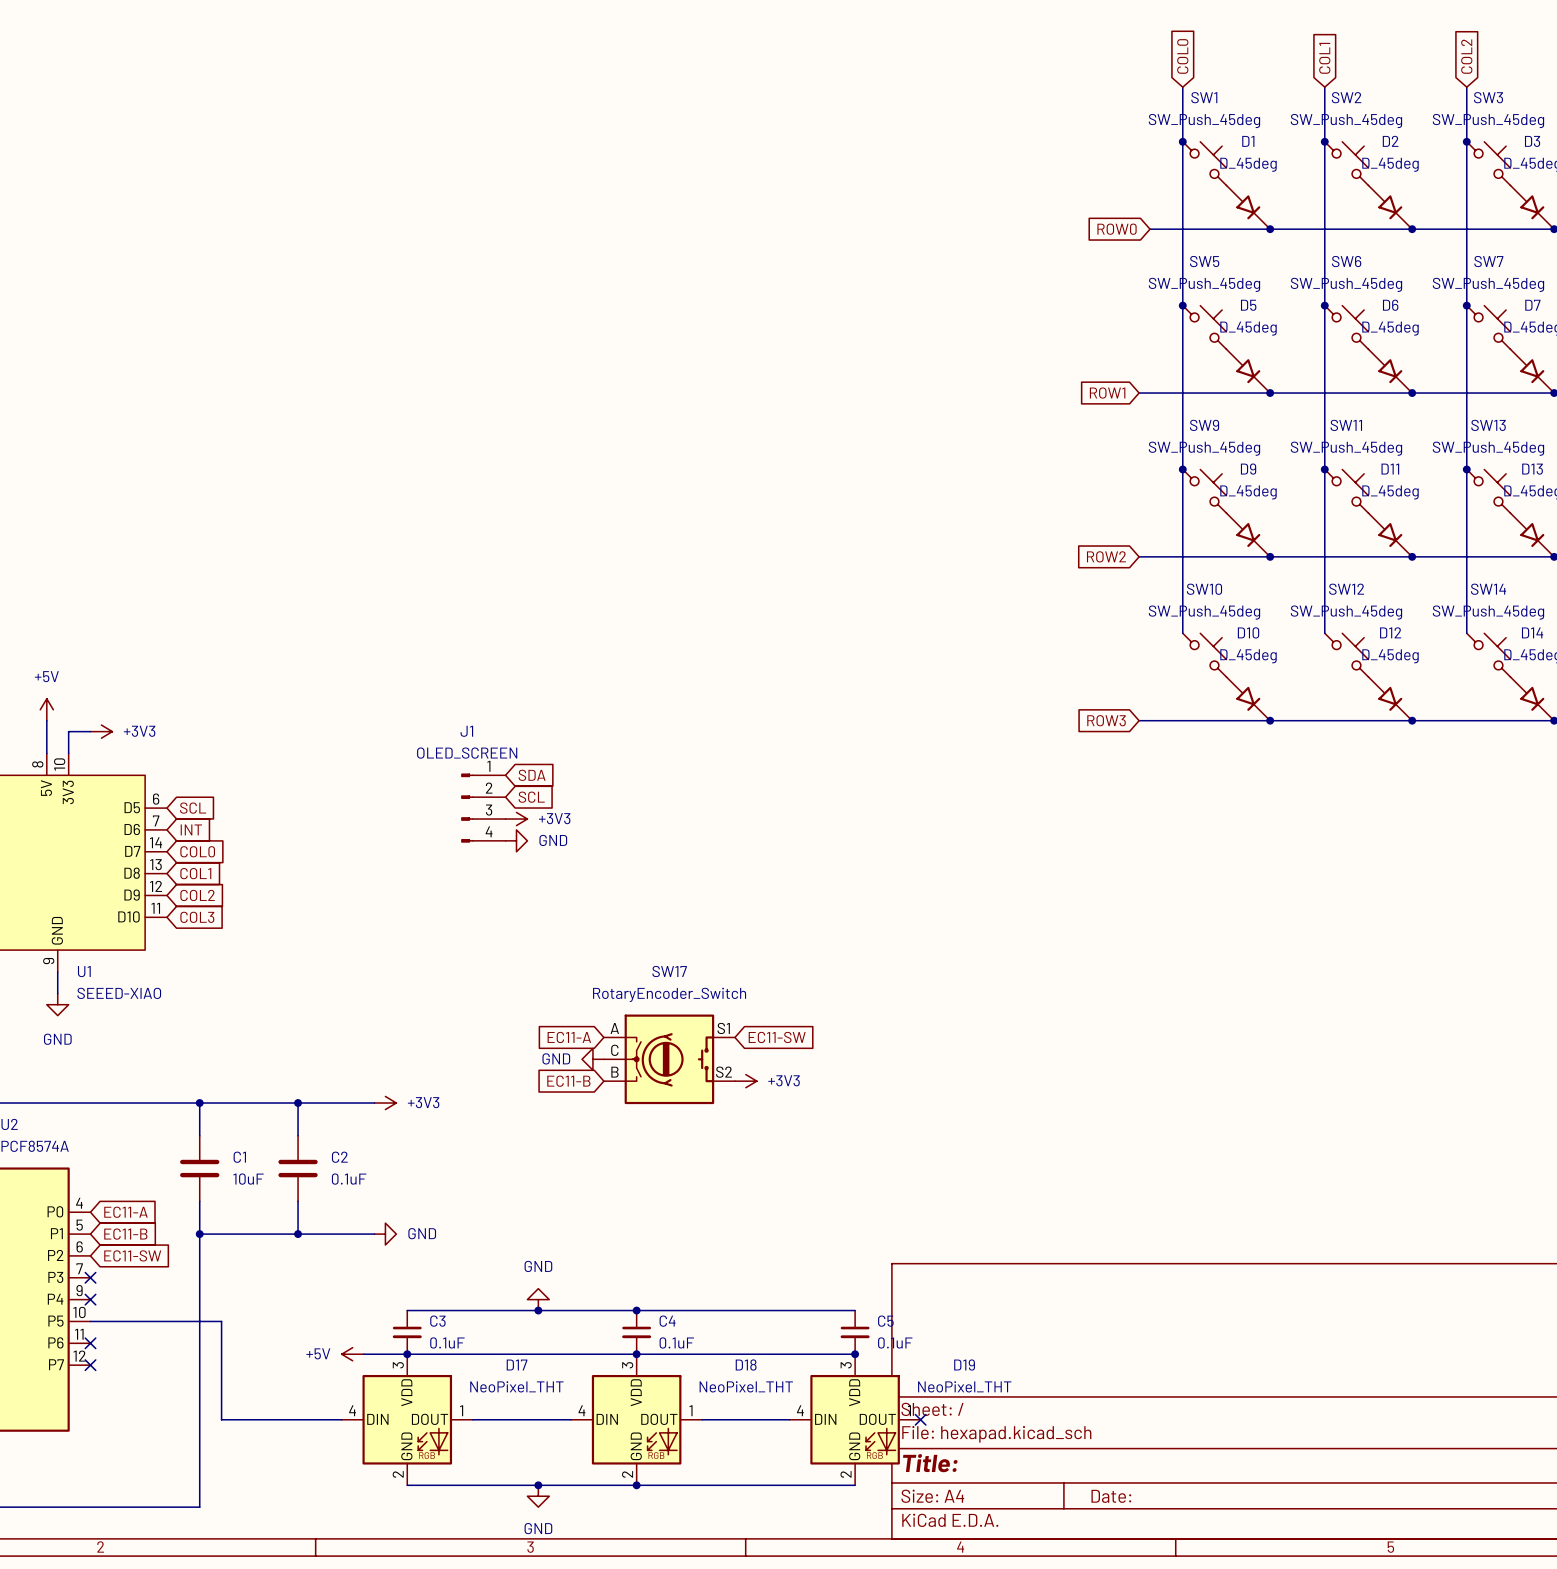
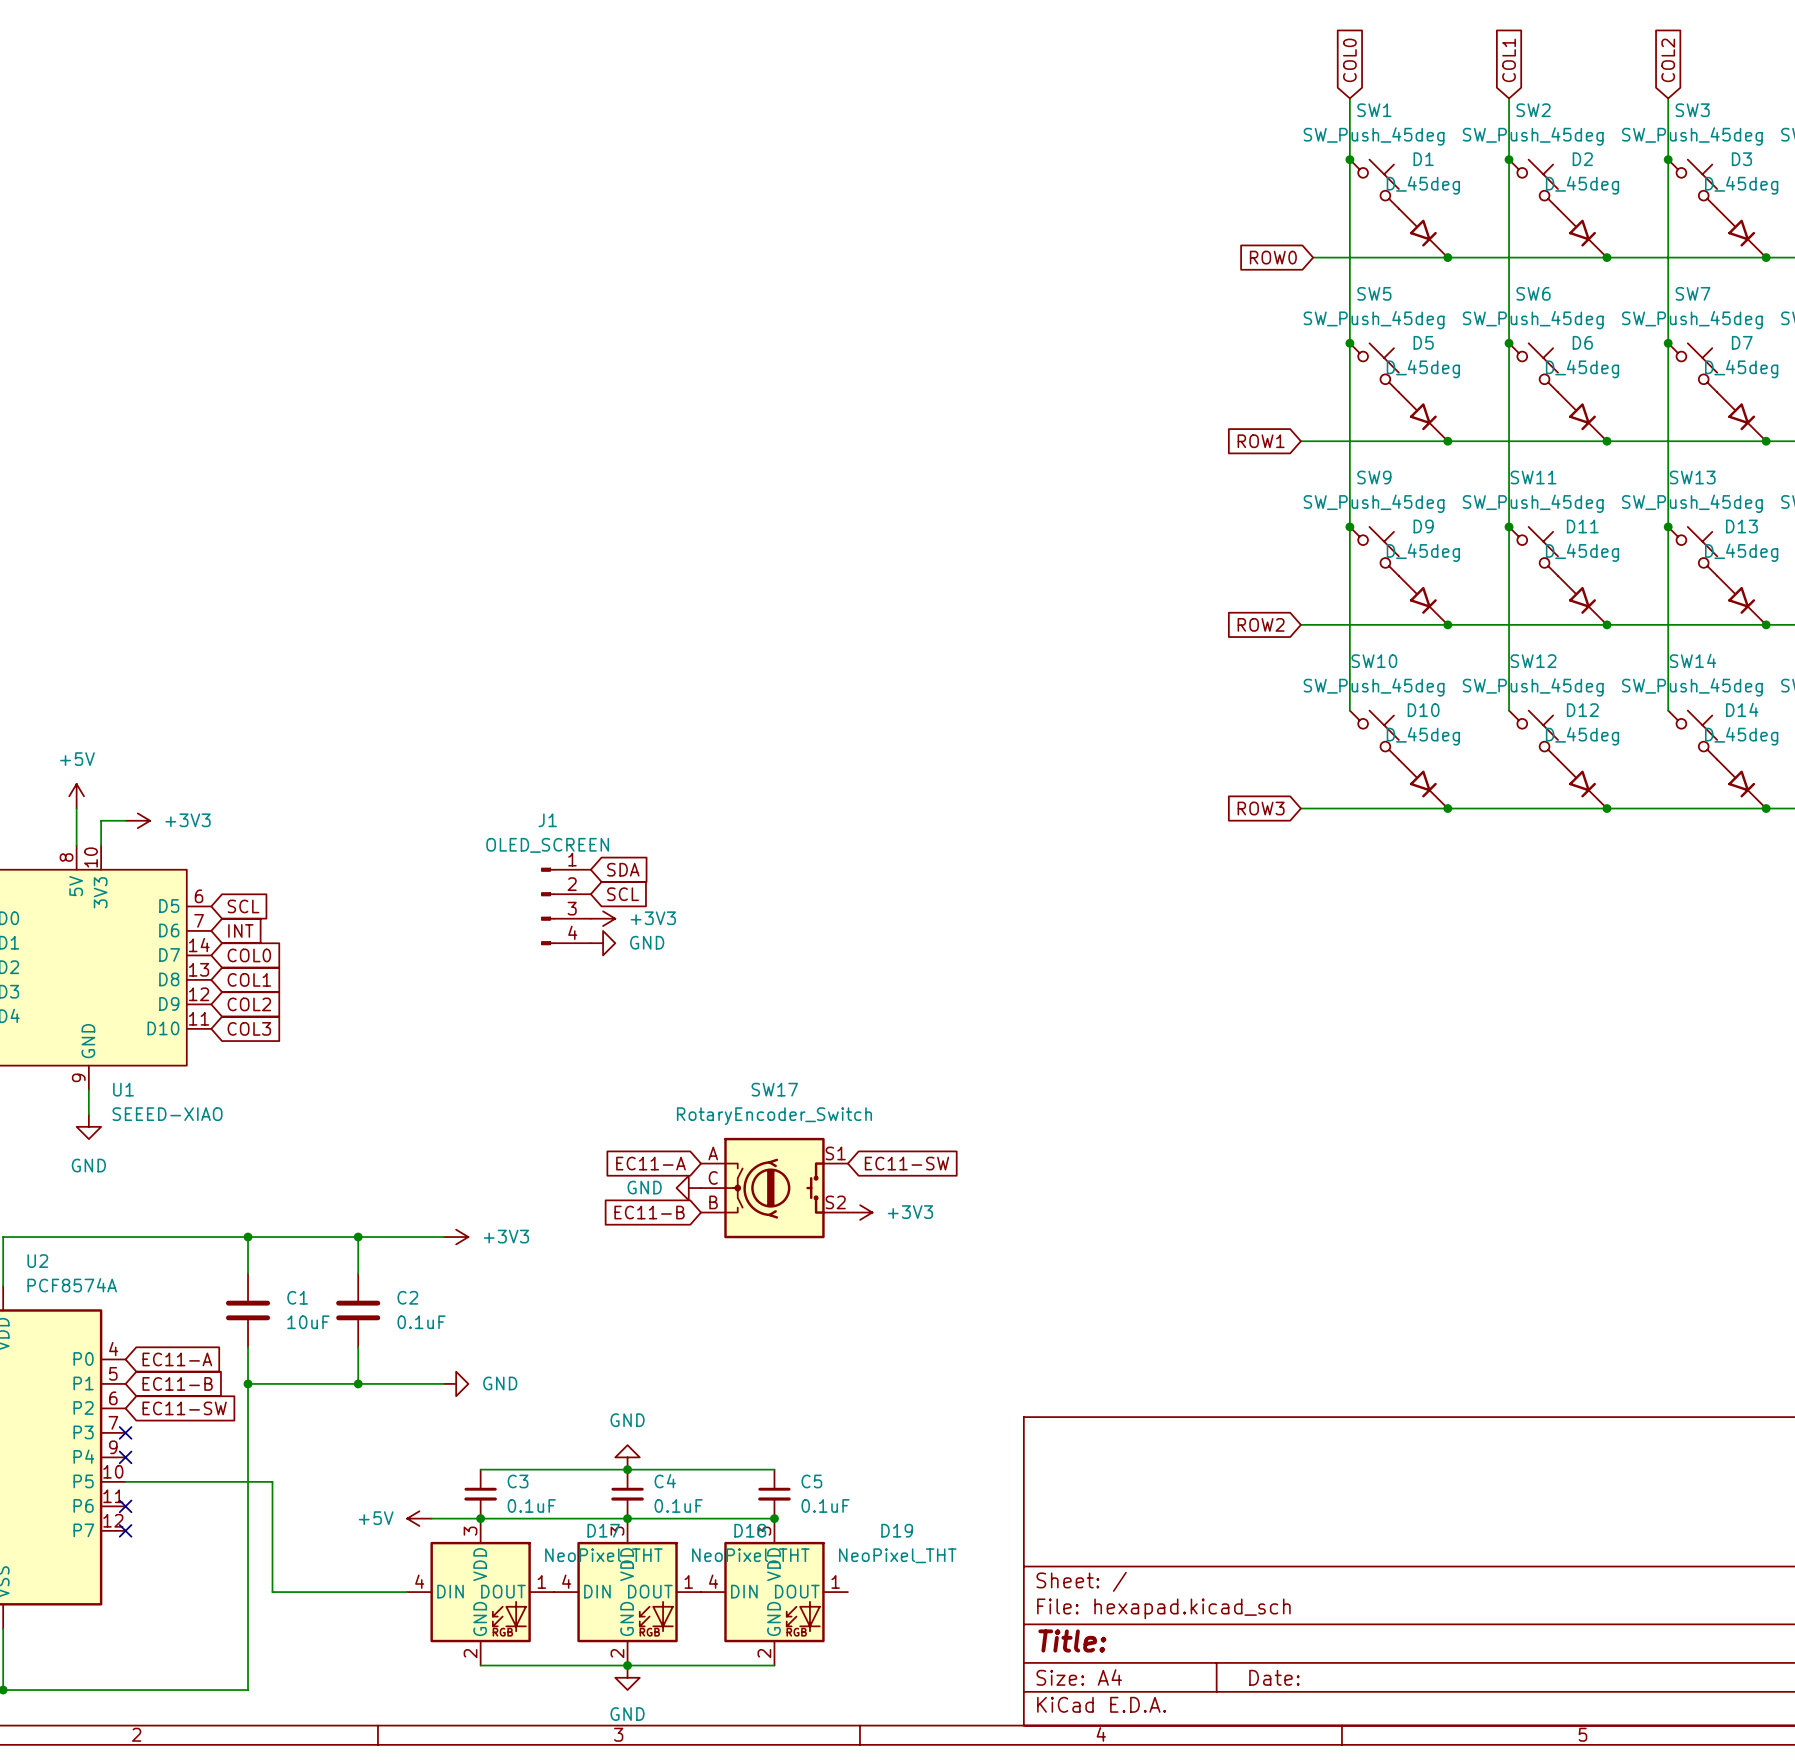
junction: (636, 1310) -> none
wire: (669, 1310) (855, 1310) -> none
C4 position: (636, 1332) -> (627, 1494)
C5 position: (855, 1332) -> (774, 1494)
junction: none -> (627, 1518)
junction: (636, 1354) -> none
wire: (669, 1354) (855, 1354) -> none
junction: none -> (774, 1518)
junction: (855, 1354) -> none
D18 position: (636, 1419) -> (627, 1592)
wire: (702, 1419) (789, 1419) -> none
D19 position: (855, 1419) -> (774, 1592)
no-connect mark: (920, 1419) -> none
junction: (636, 1485) -> none
wire: (669, 1485) (855, 1485) -> none

